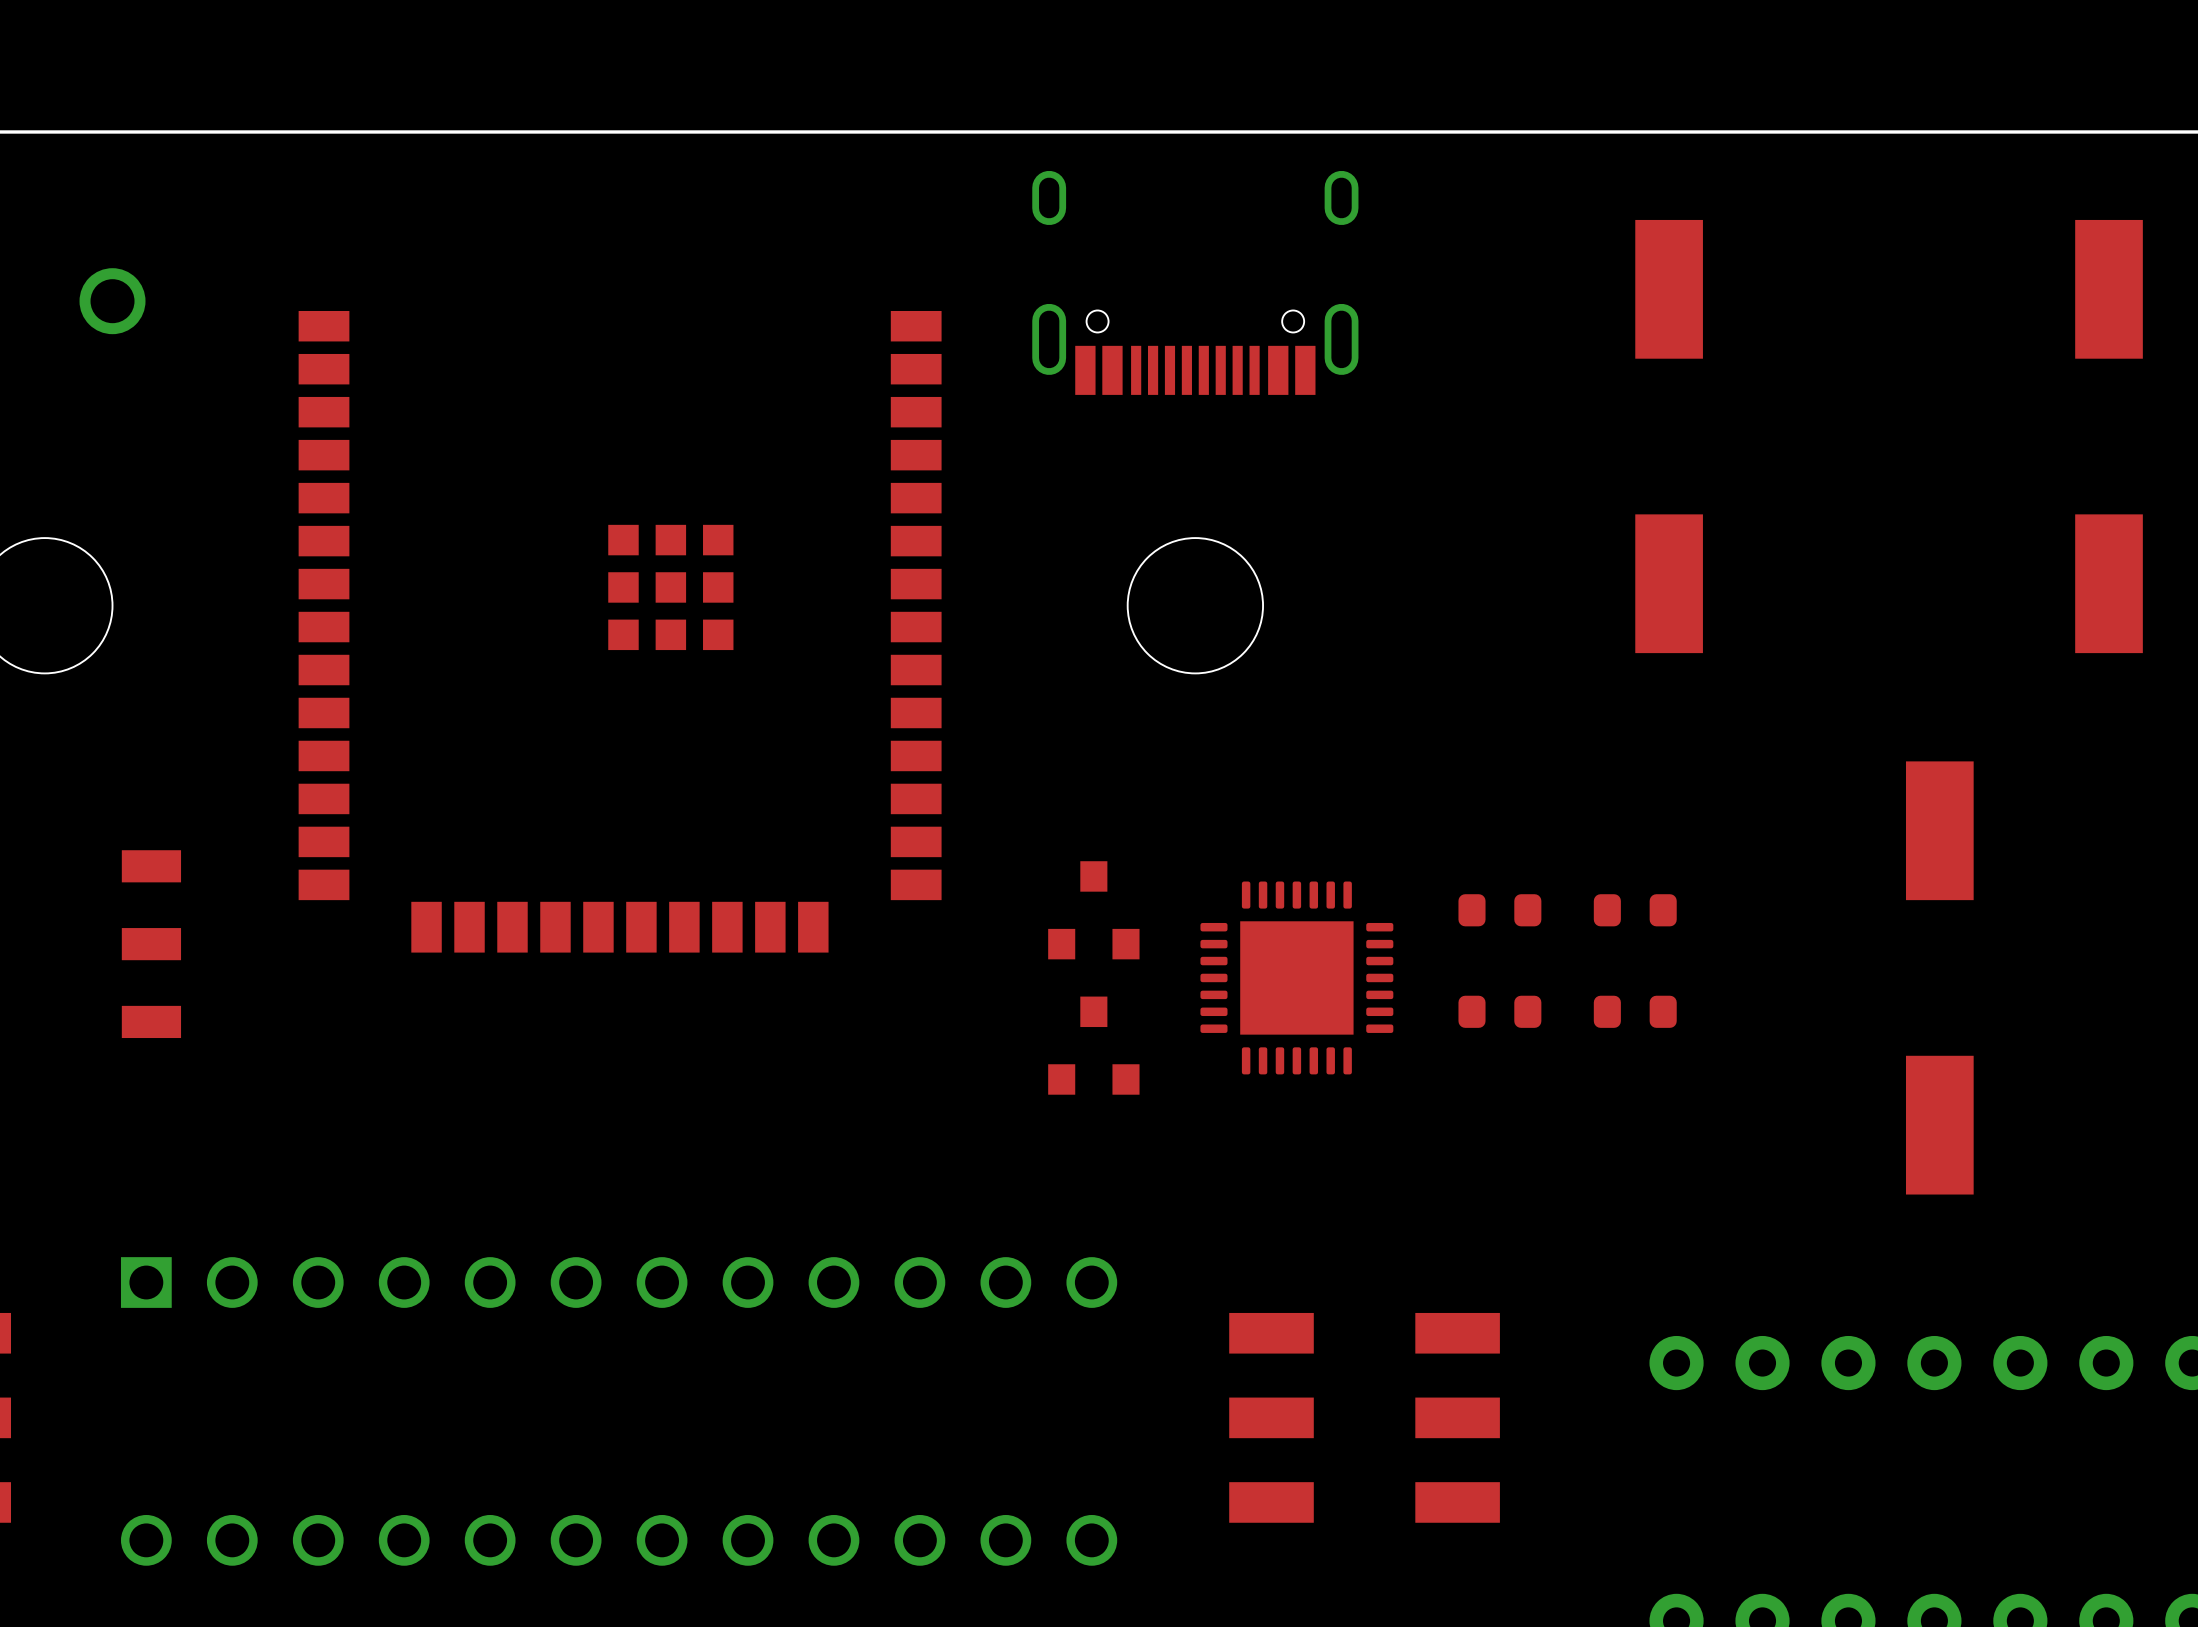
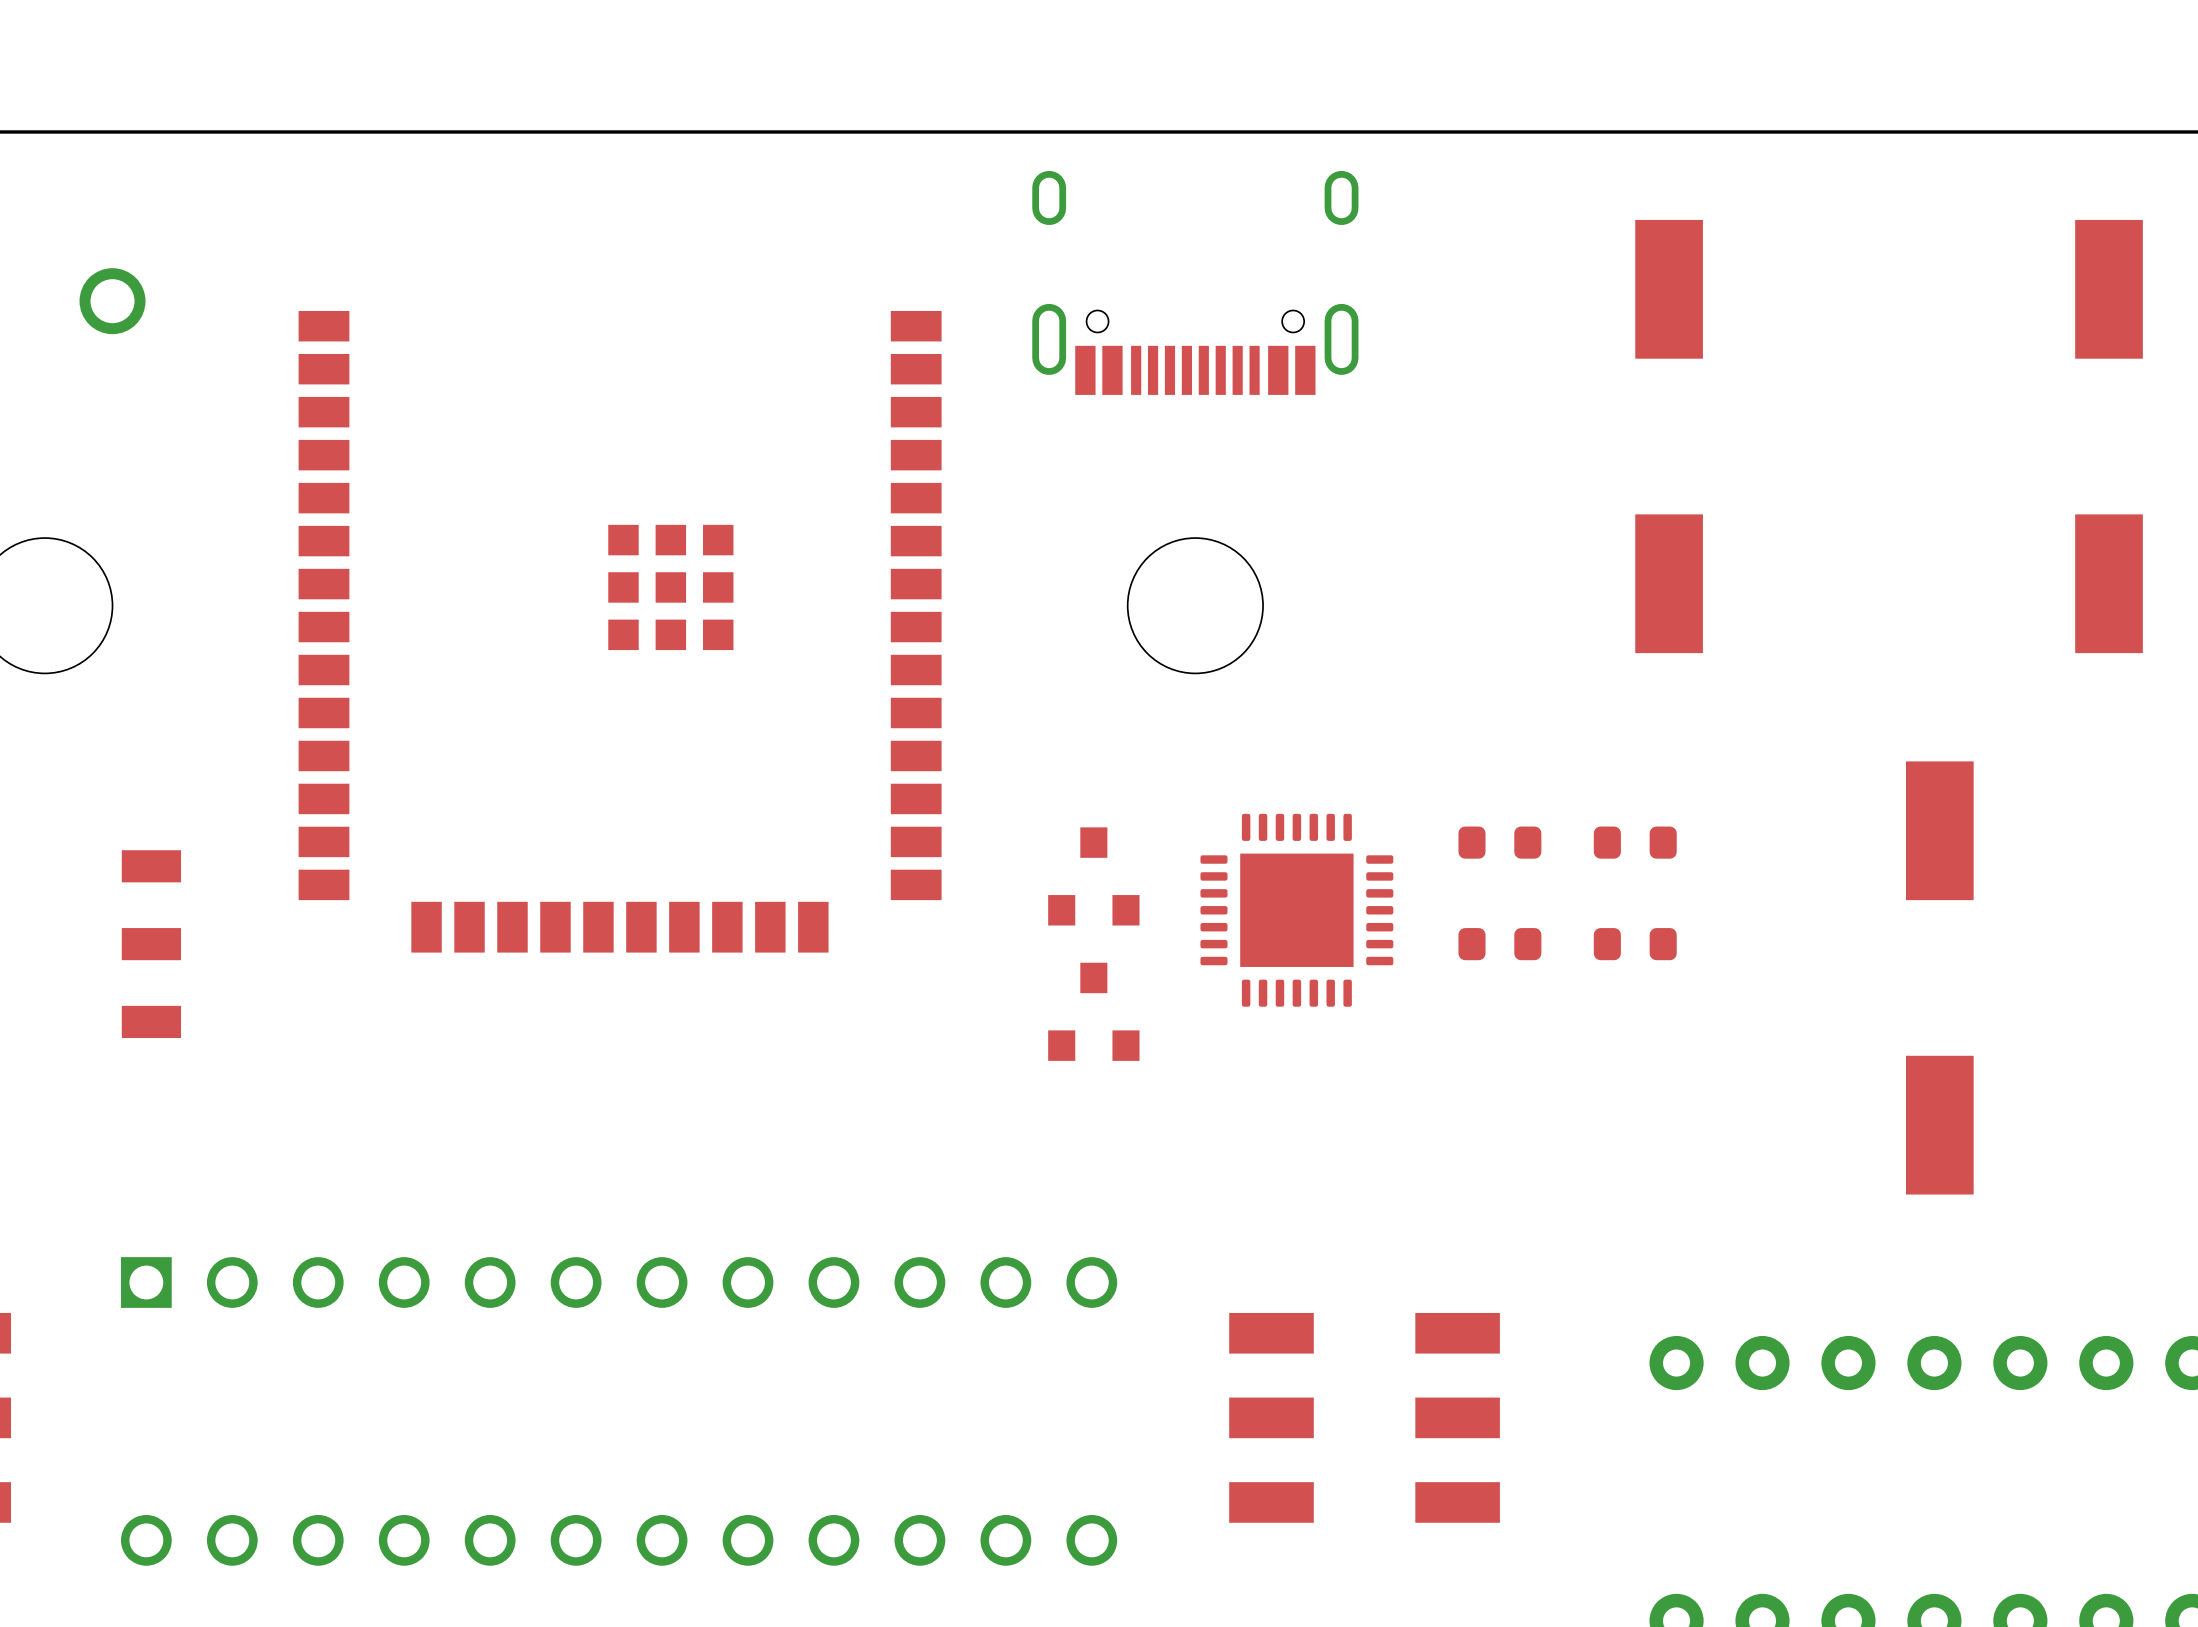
part: none -> (1499, 842)
part: none -> (1635, 842)
part position: (1093, 910) -> (1093, 876)
part: (1499, 910) -> none
part: (1635, 910) -> none
part: none -> (1499, 944)
part: none -> (1635, 944)
part position: (1296, 977) -> (1296, 910)
part: (1499, 1011) -> none
part: (1635, 1011) -> none
part position: (1093, 1045) -> (1093, 1011)

